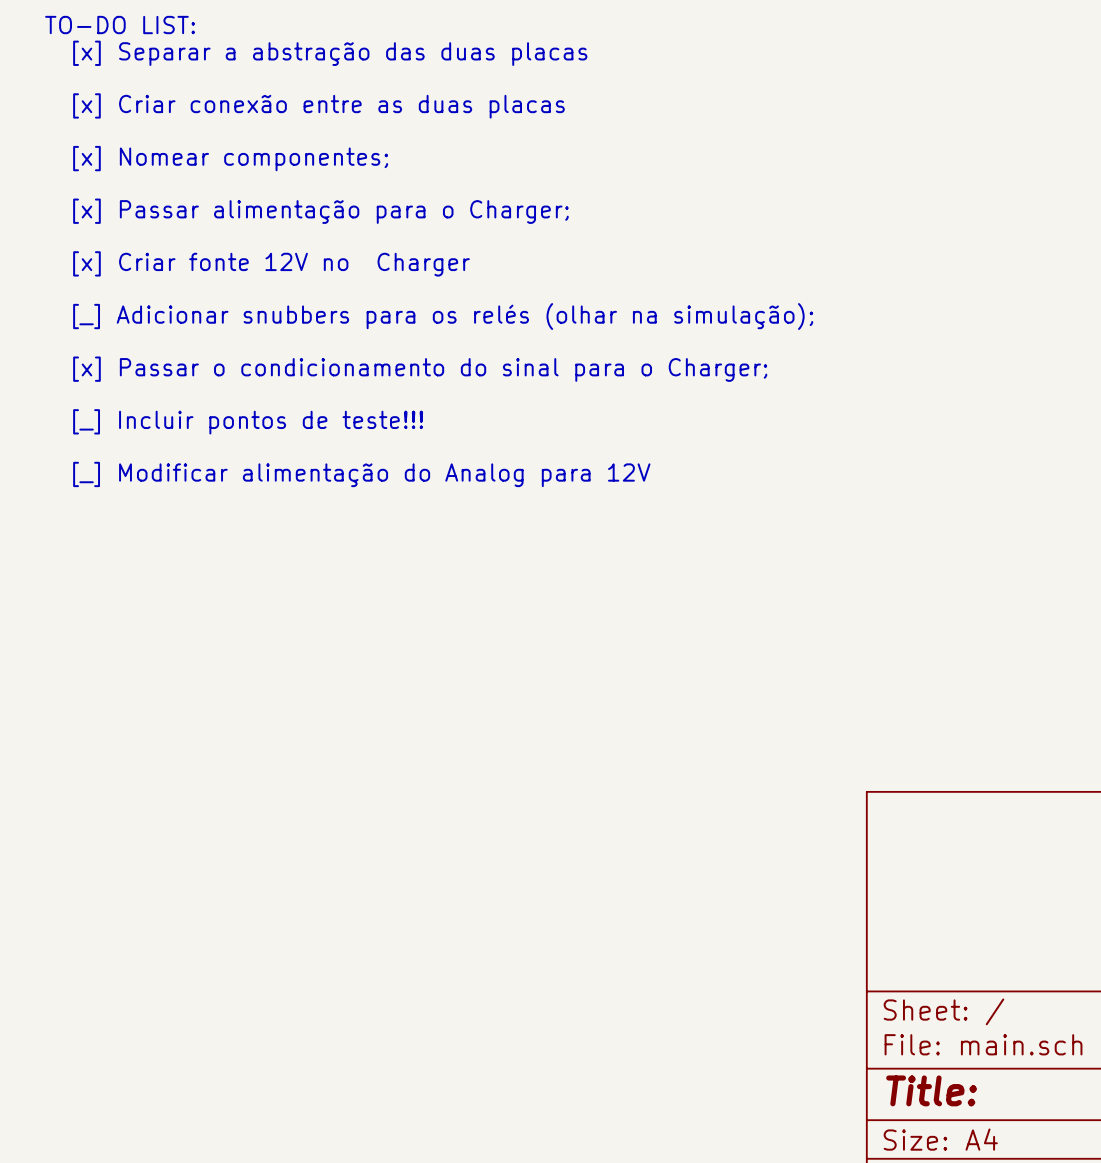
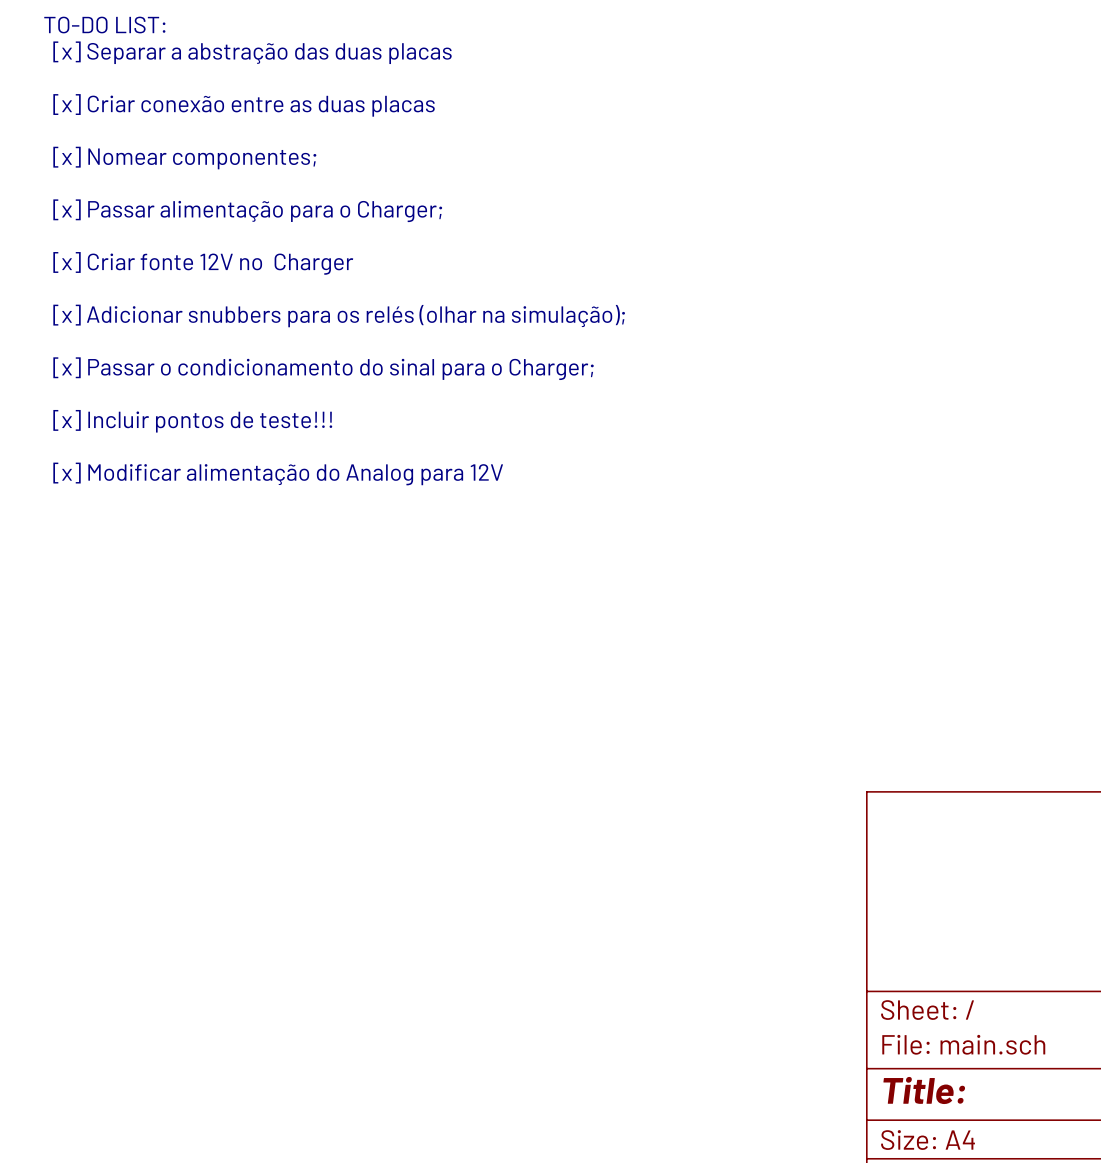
text: [_] Adicionar snubbers para os relés (olhar na simulação); (443, 316) -> [x] Adicionar snubbers para os relés (olhar na simulação); (339, 315)
text: [_] Incluir pontos de teste!!! (248, 421) -> [x] Incluir pontos de teste!!! (192, 421)
text: [_] Modificar alimentação do Analog para 12V (361, 474) -> [x] Modificar alimentação do Analog para 12V (278, 473)

